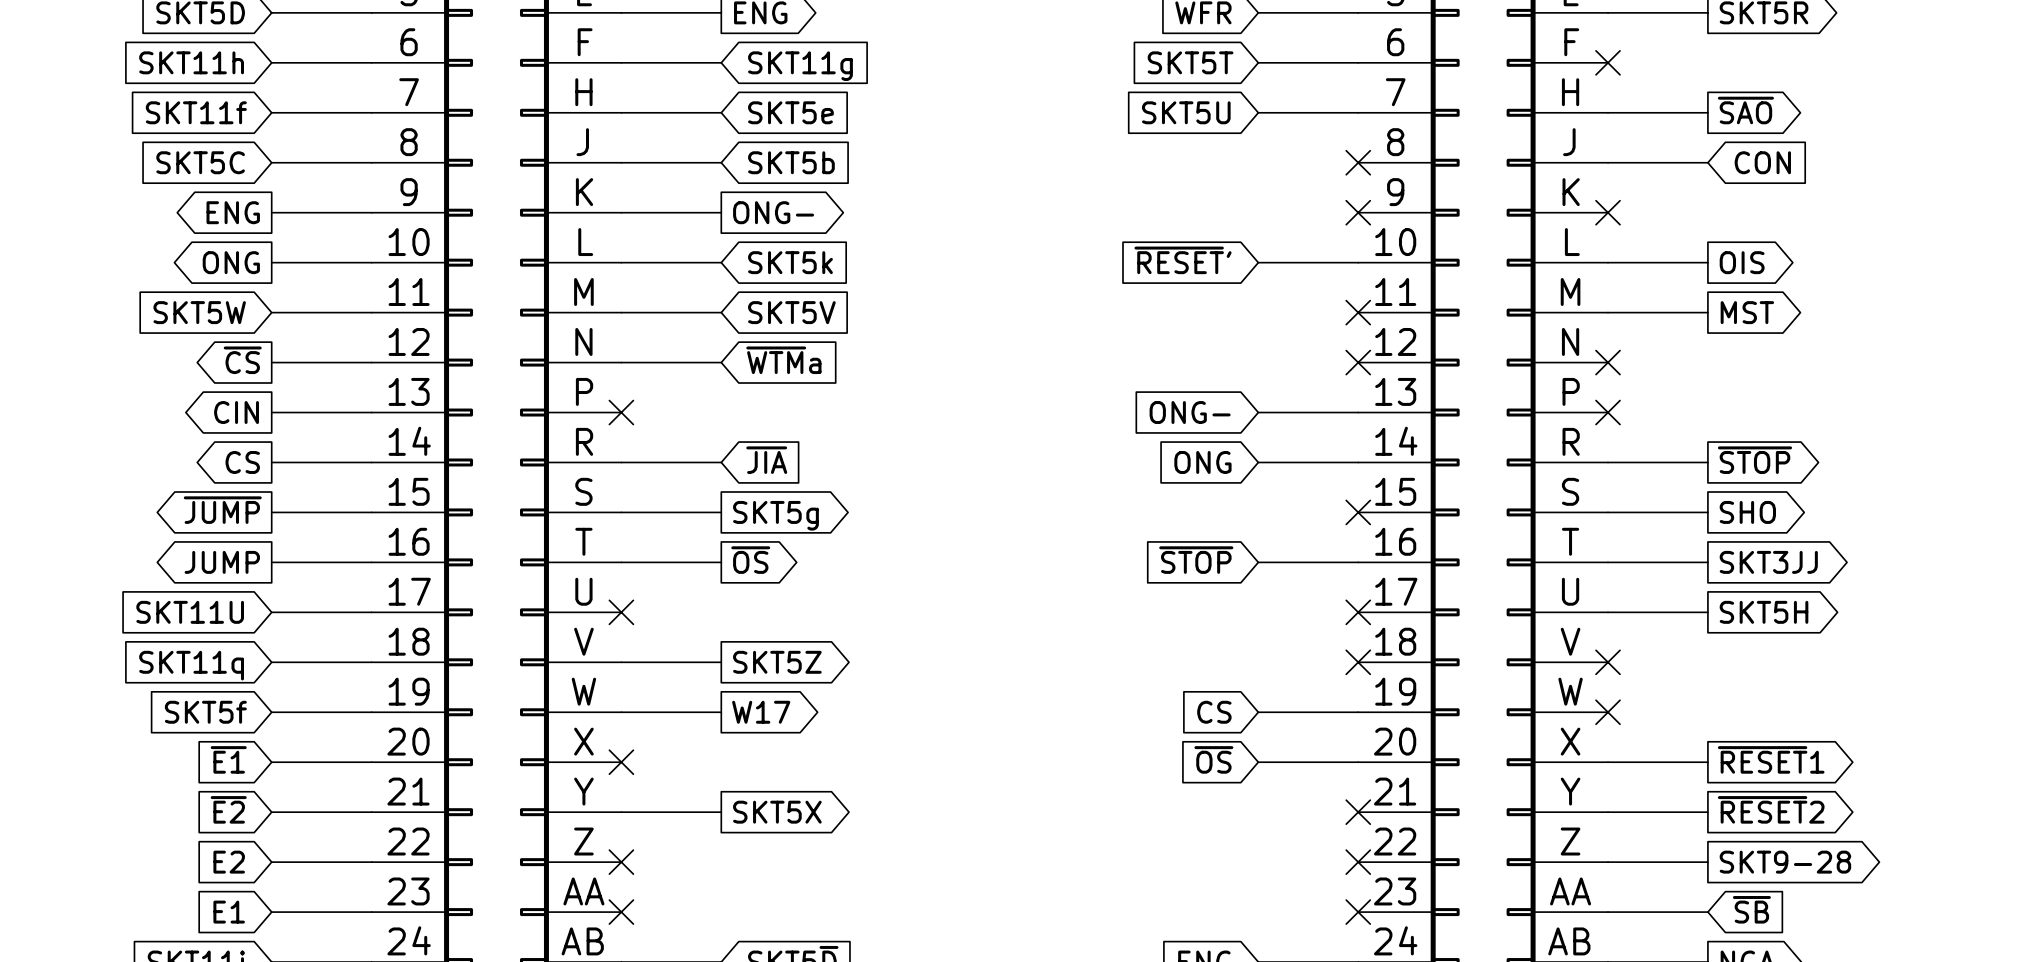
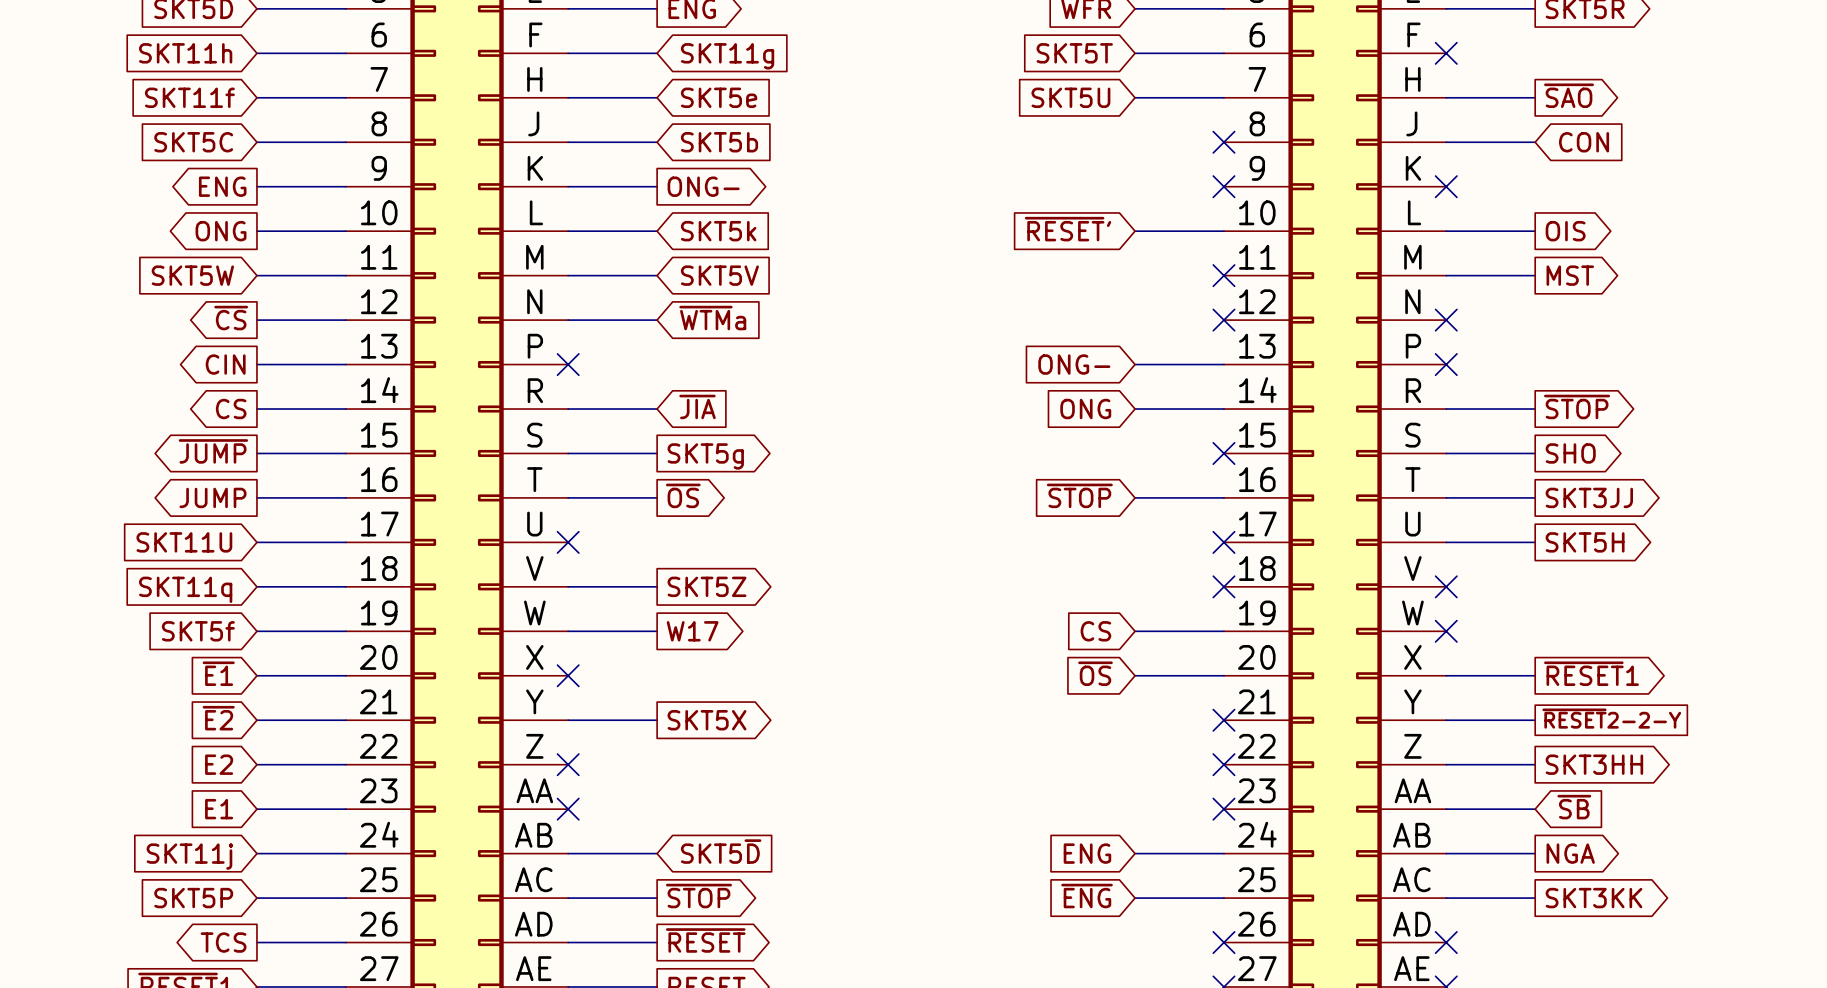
global label shape: output (1771, 809) -> passive (1611, 718)
global label: ~{RESET}2 (1771, 809) -> ~{RESET}2-2-Y (1611, 718)
global label: SKT9-28 (1785, 862) -> SKT3HH (1594, 764)

